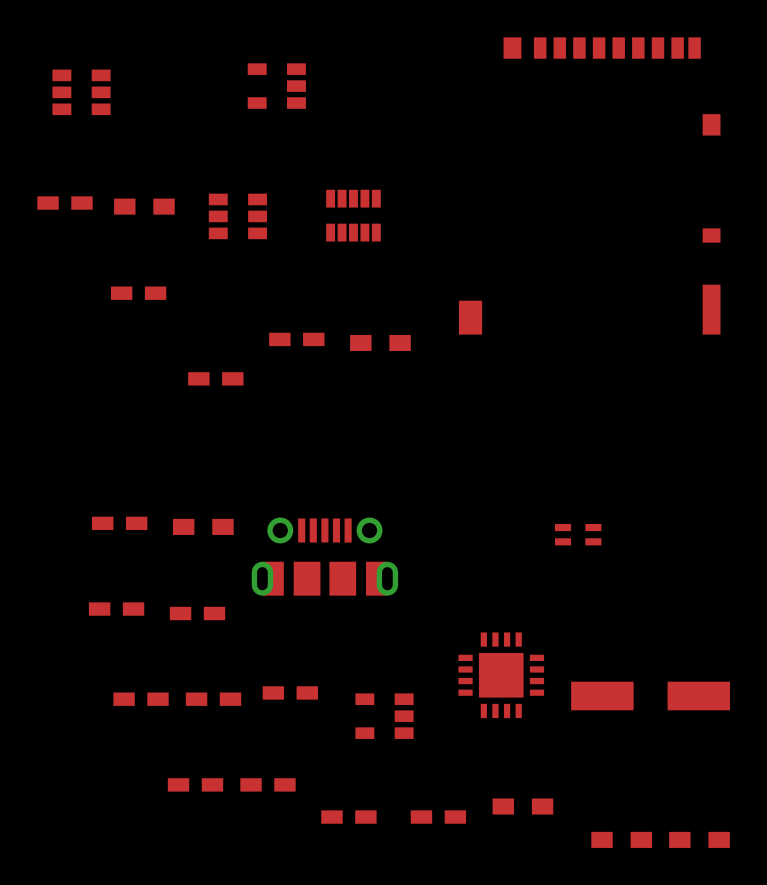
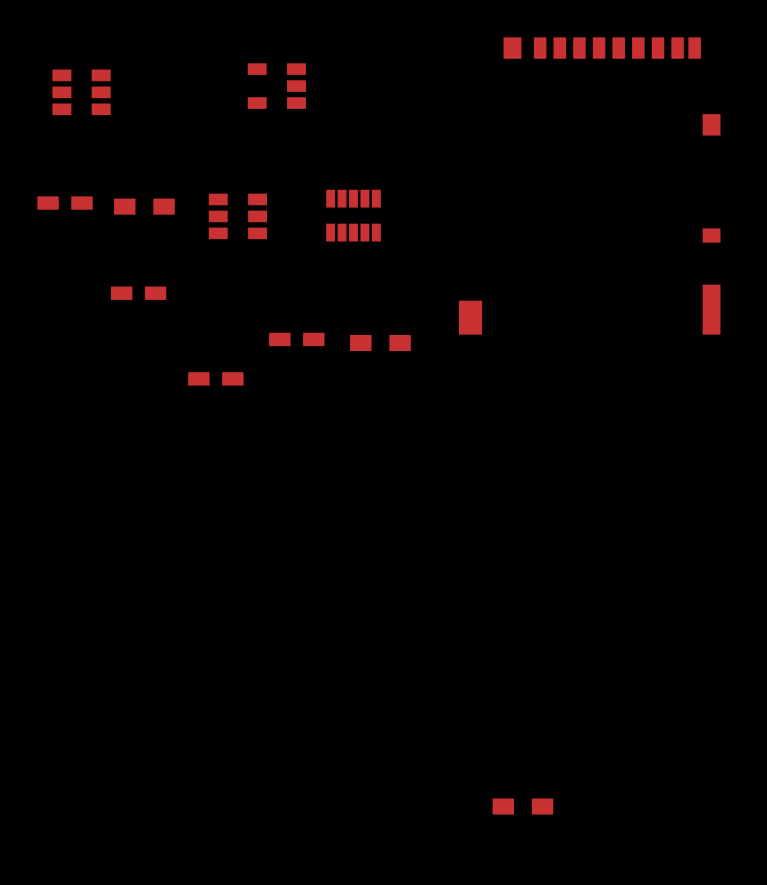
part: (119, 523) -> none
part: (203, 526) -> none
part: (578, 534) -> none
part: (324, 556) -> none
part: (116, 609) -> none
part: (197, 613) -> none
part: (501, 675) -> none
part: (290, 692) -> none
part: (650, 695) -> none
part: (141, 699) -> none
part: (213, 699) -> none
part: (384, 716) -> none
part: (195, 784) -> none
part: (267, 784) -> none
part: (348, 817) -> none
part: (438, 817) -> none
part: (621, 839) -> none
part: (699, 839) -> none

